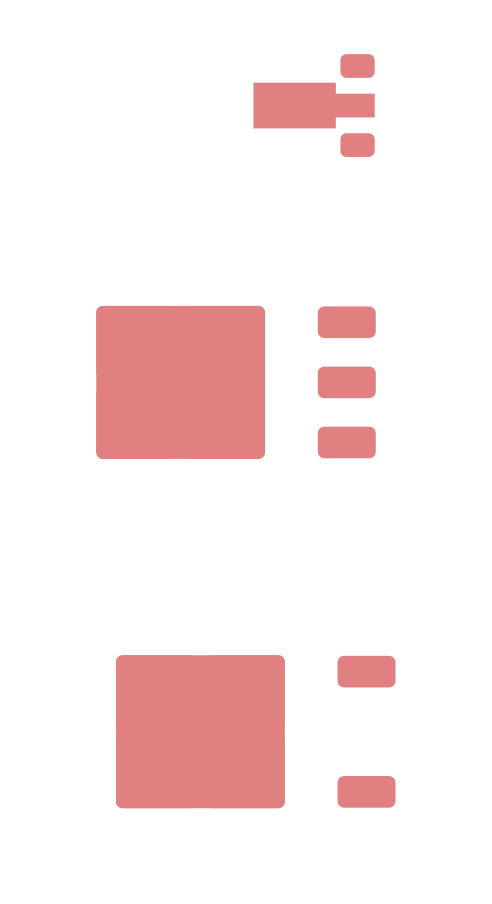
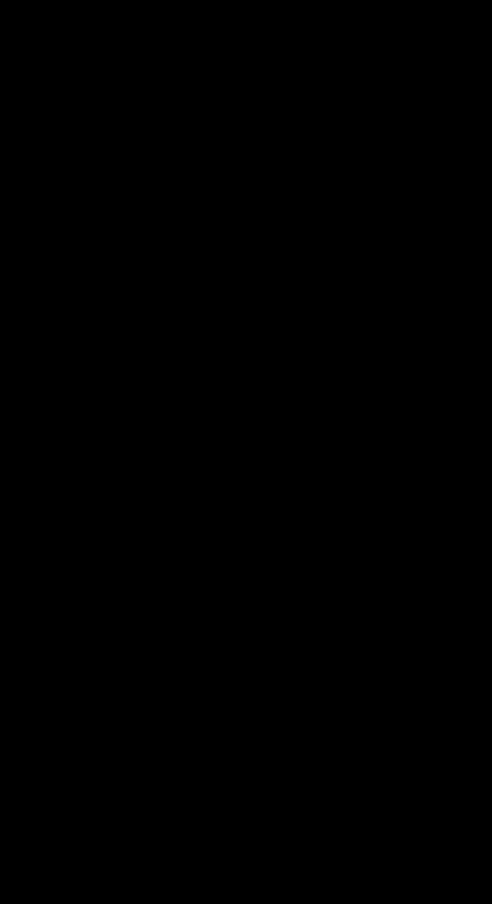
part: (314, 105) -> none
part: (236, 382) -> none
part: (255, 731) -> none

